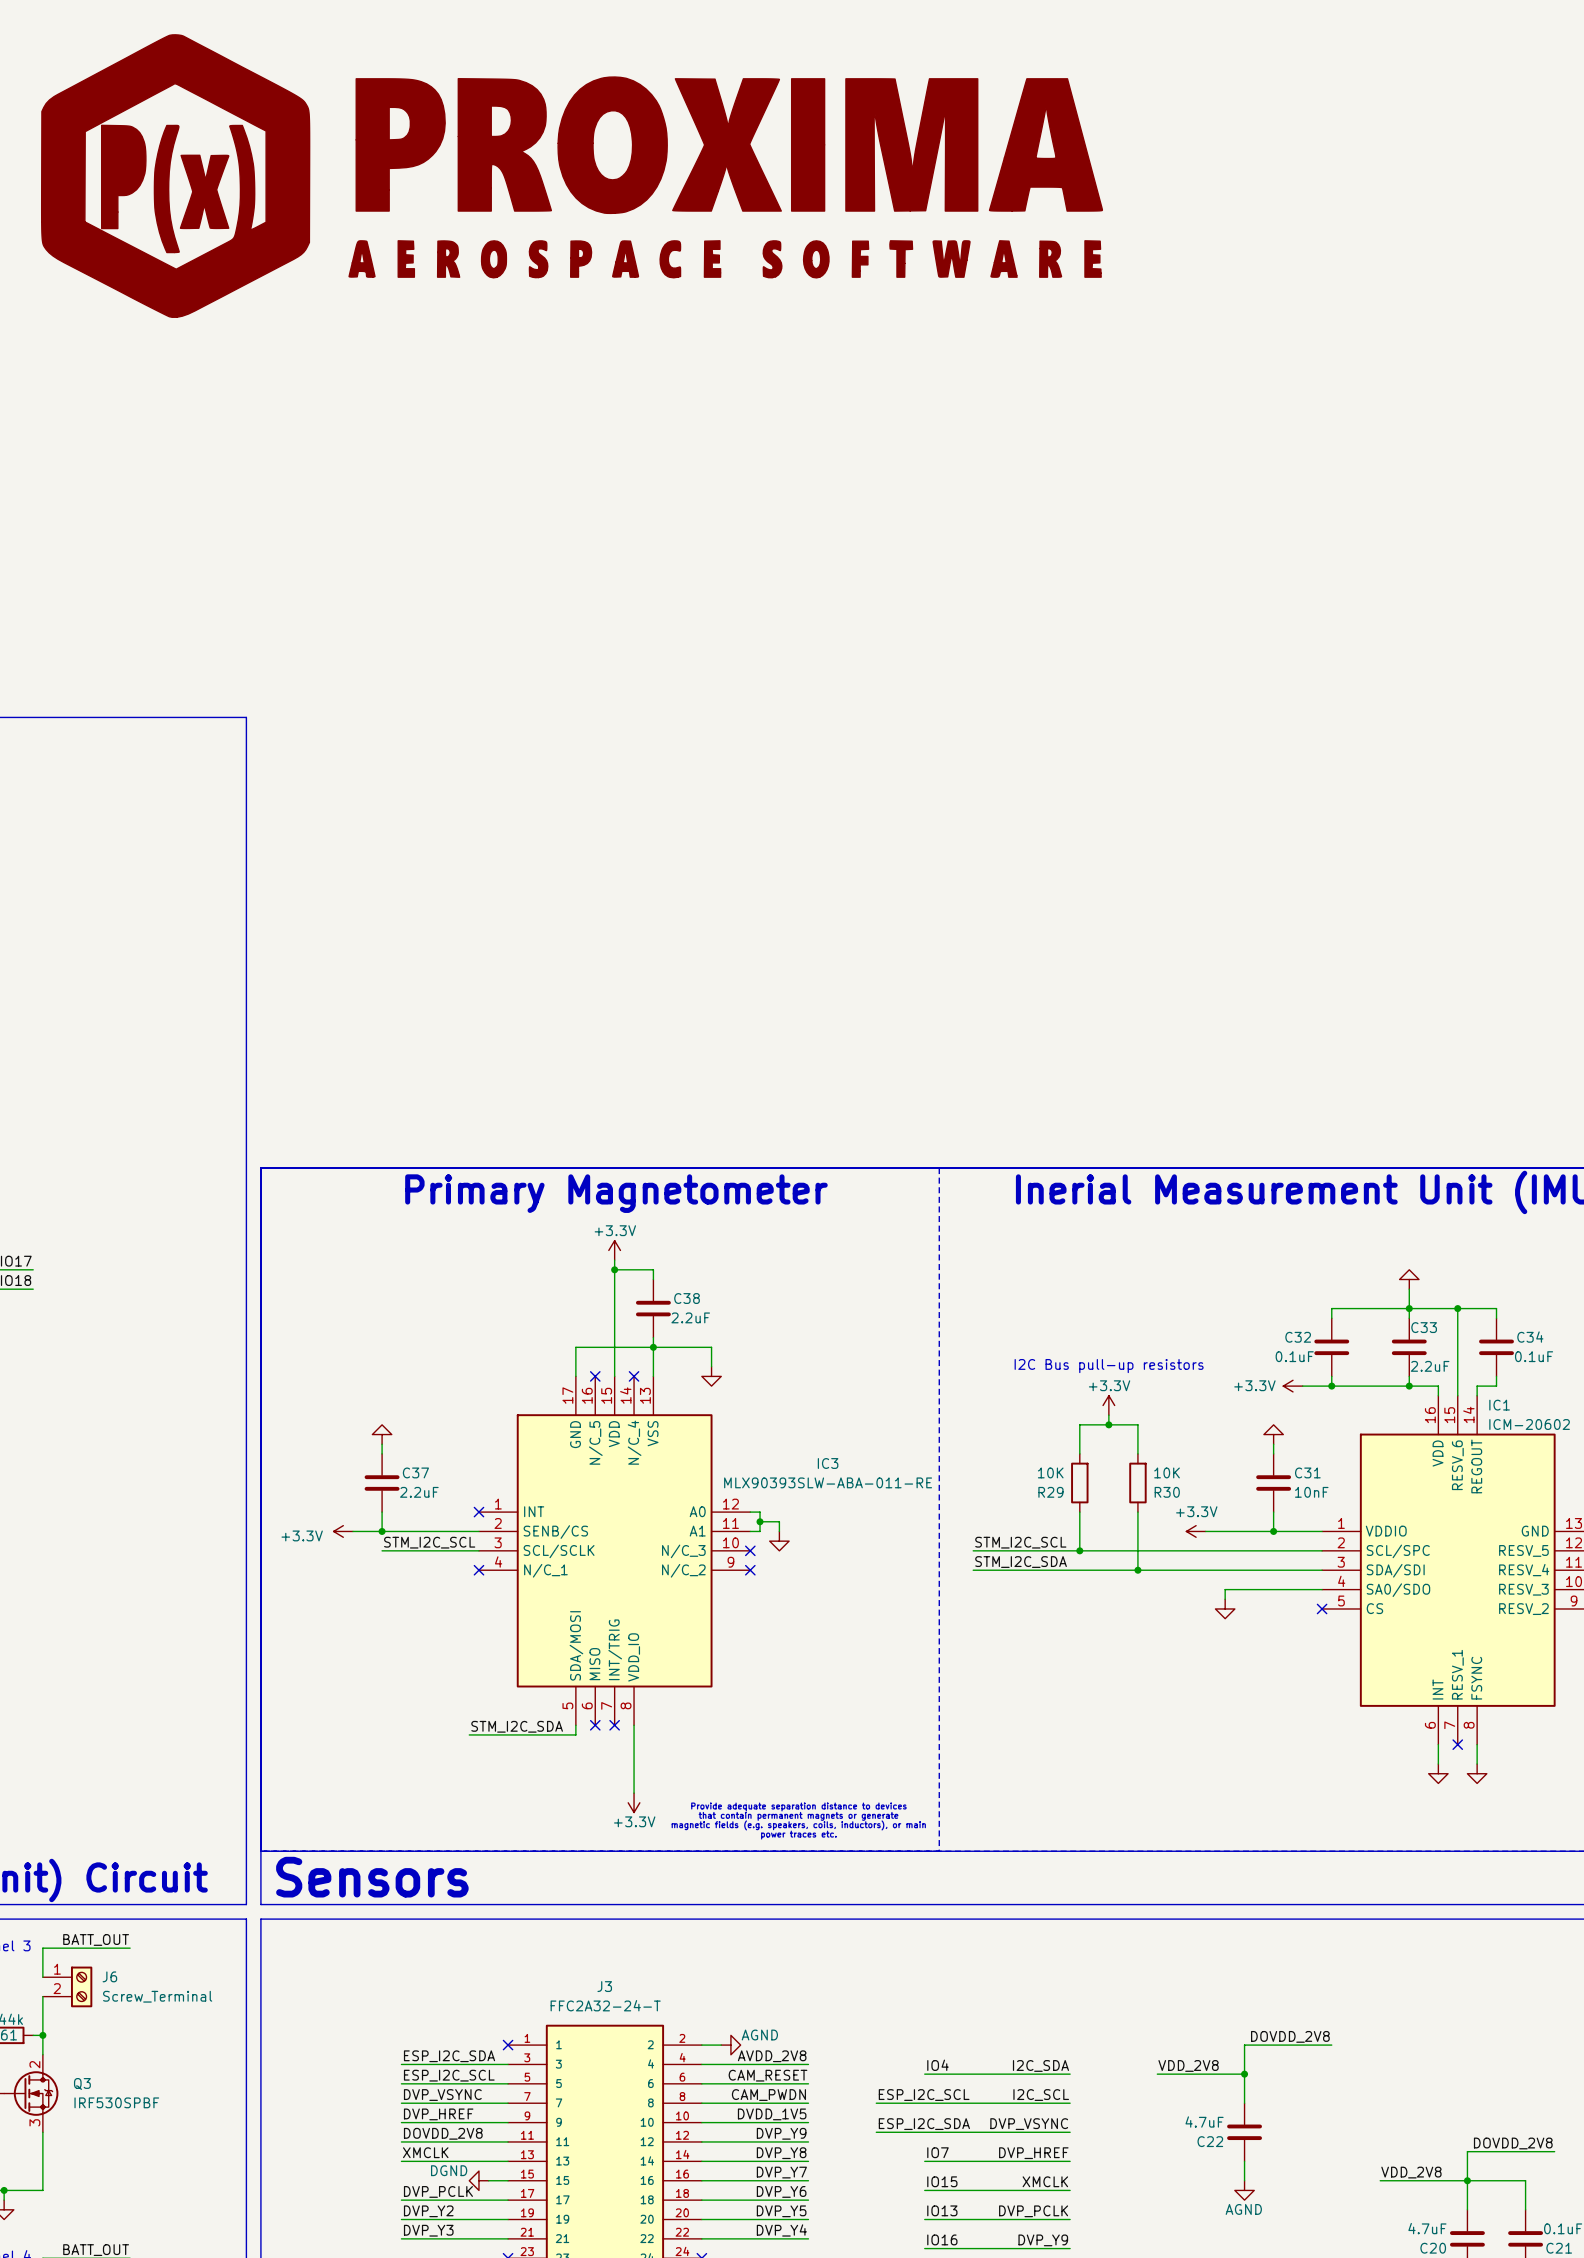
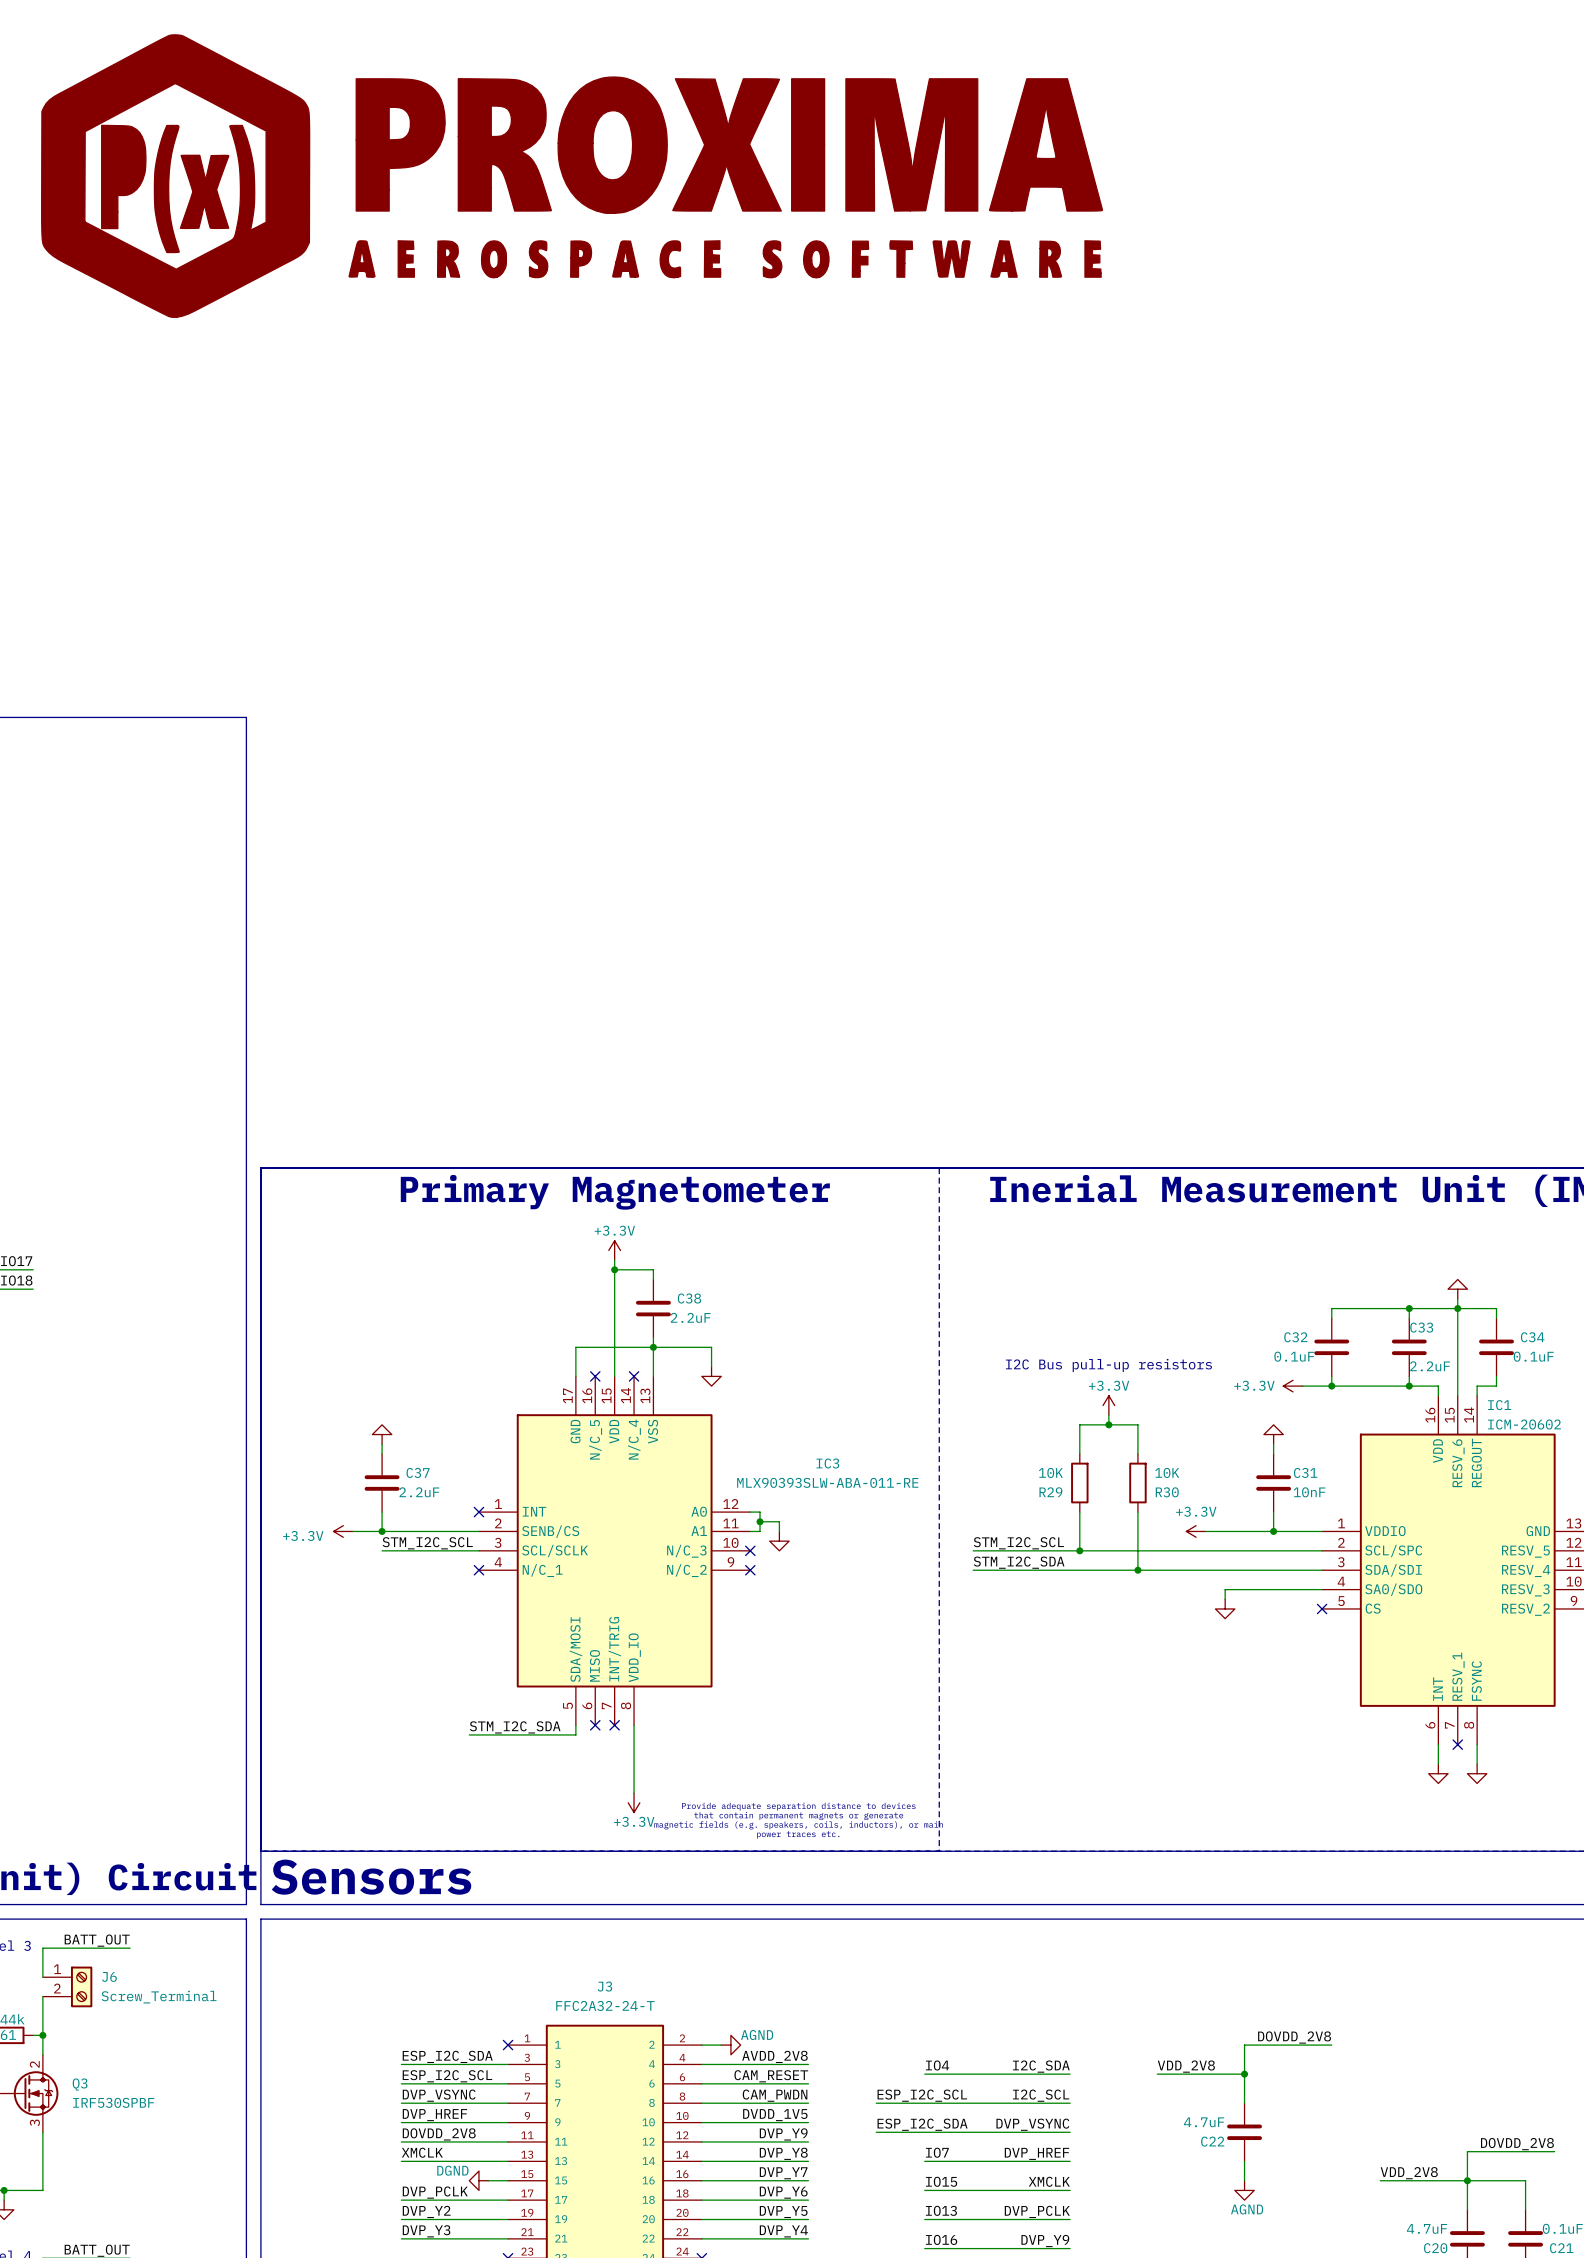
power symbol position: (1409, 1279) -> (1457, 1289)
wire: (1409, 1289) (1409, 1308) -> none
wire: none -> (1457, 1298) (1457, 1308)

